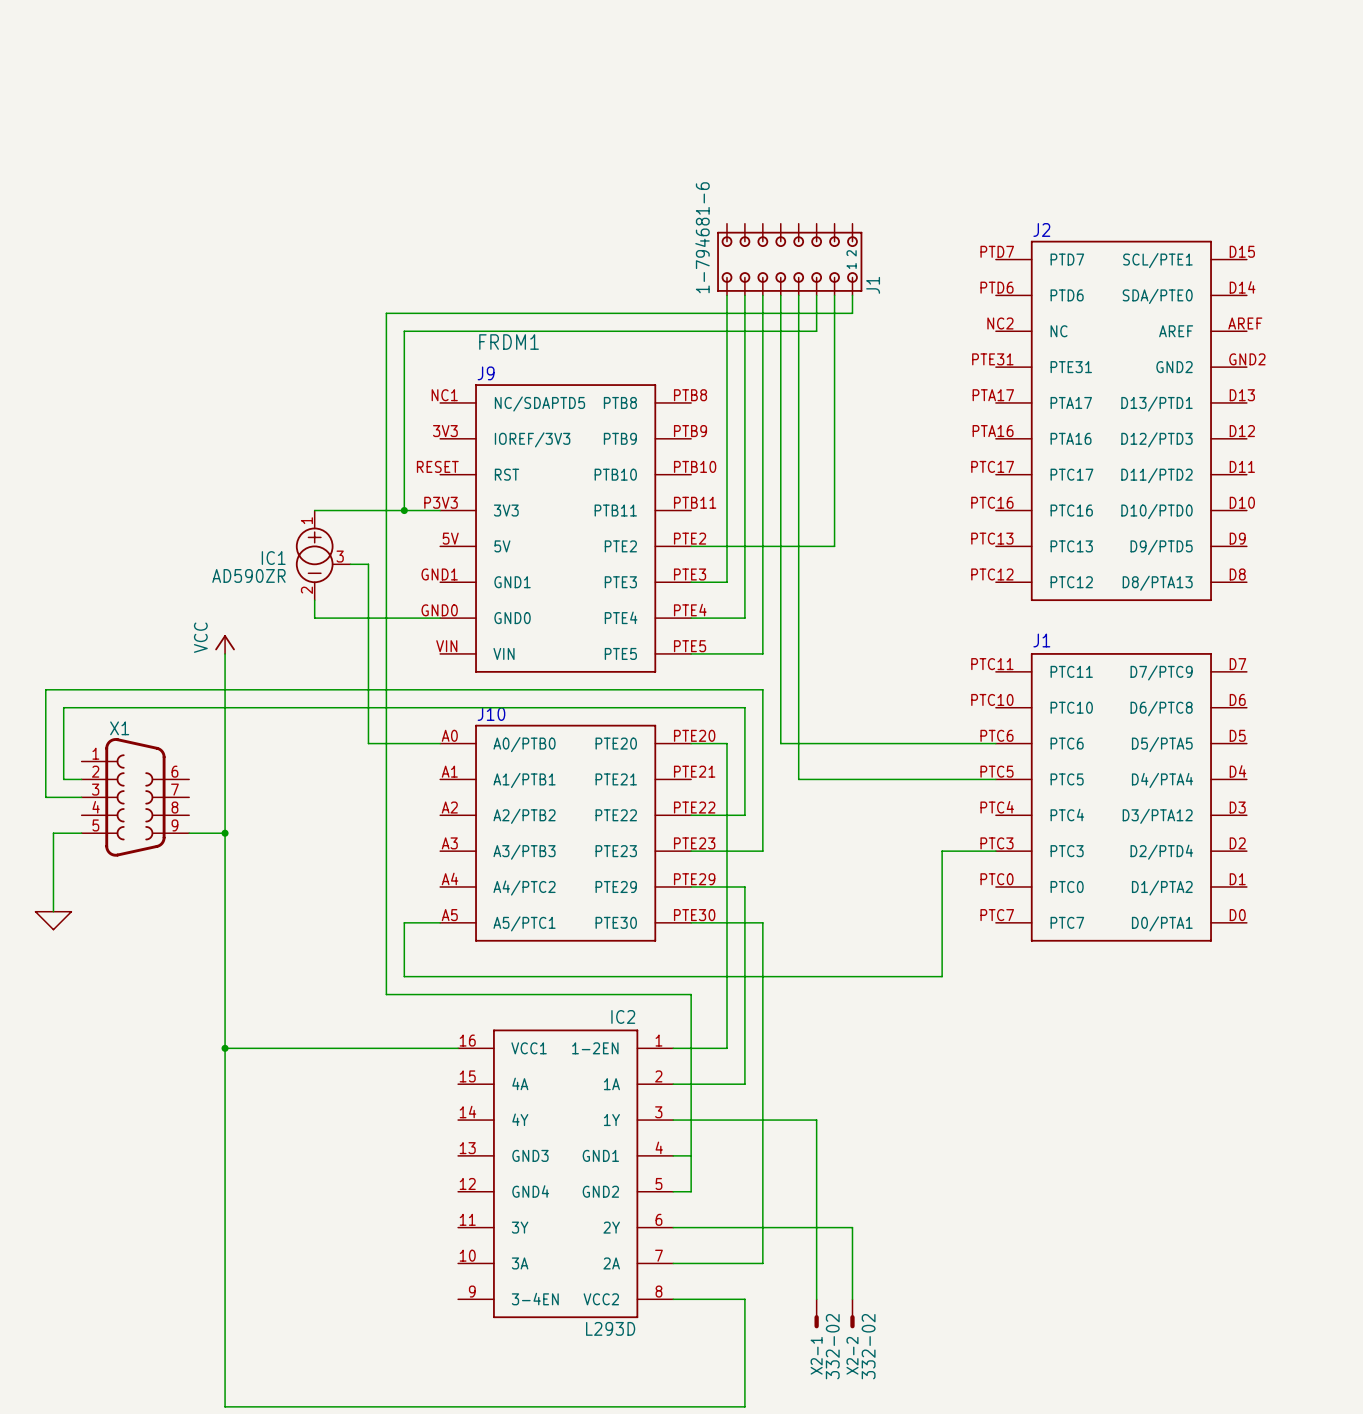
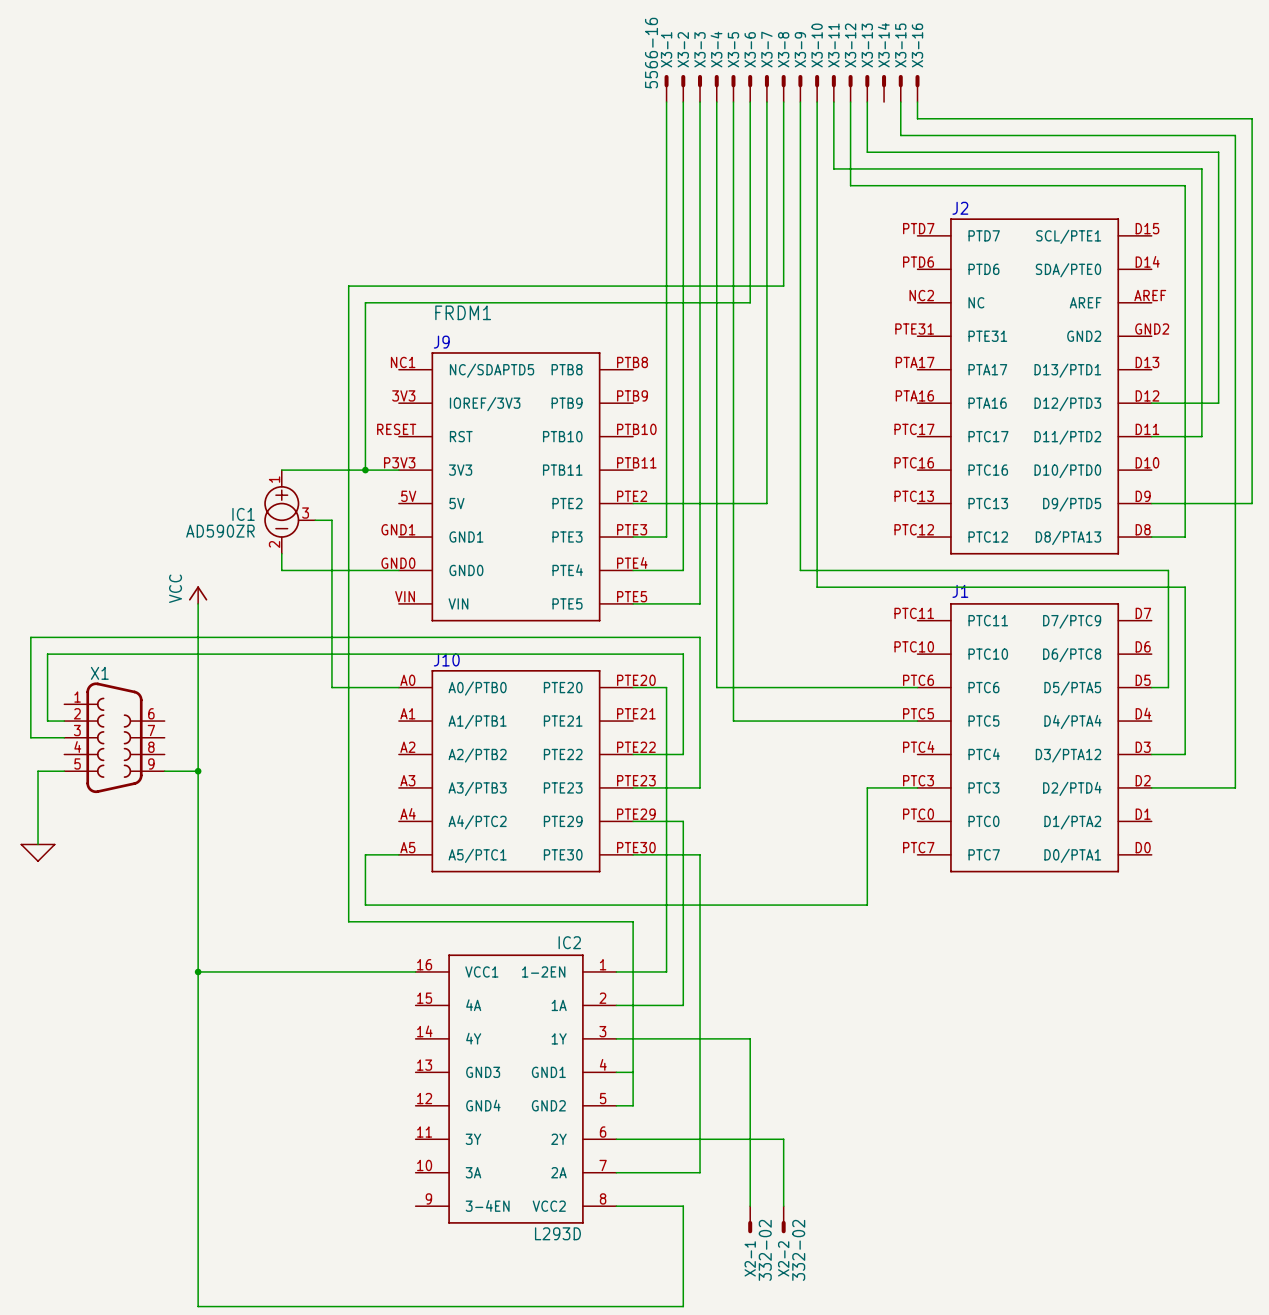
X3-1: none -> 5566-16 (666, 88)
X3-2: none -> (683, 88)
X3-3: none -> (700, 88)
X3-4: none -> (716, 88)
X3-5: none -> (733, 88)
X3-6: none -> (750, 88)
X3-7: none -> (766, 88)
X3-8: none -> (783, 88)
X3-9: none -> (800, 88)
X3-10: none -> (817, 88)
X3-11: none -> (833, 88)
X3-12: none -> (850, 88)
X3-13: none -> (867, 88)
X3-14: none -> (884, 88)
X3-15: none -> (900, 88)
X3-16: none -> (917, 88)
wire: none -> (666, 102) (666, 269)
wire: none -> (683, 102) (683, 269)
wire: none -> (700, 102) (700, 269)
wire: none -> (716, 102) (716, 269)
wire: none -> (733, 102) (733, 269)
wire: none -> (750, 102) (750, 269)
wire: none -> (766, 102) (766, 269)
wire: none -> (783, 102) (783, 269)
wire: none -> (800, 102) (800, 570) (1168, 570) (1168, 687) (1151, 687)
wire: none -> (817, 102) (817, 587) (1185, 587) (1185, 754) (1151, 754)
wire: none -> (833, 102) (833, 168) (1201, 168) (1201, 436) (1151, 436)
wire: none -> (850, 102) (850, 185) (1185, 185) (1185, 537) (1151, 537)
wire: none -> (867, 102) (867, 152) (1218, 152) (1218, 403) (1151, 403)
wire: none -> (900, 102) (900, 135) (1235, 135) (1235, 787) (1151, 787)
wire: none -> (917, 102) (917, 118) (1252, 118) (1252, 503) (1151, 503)
J1: 1-794681-6 (789, 259) -> none

